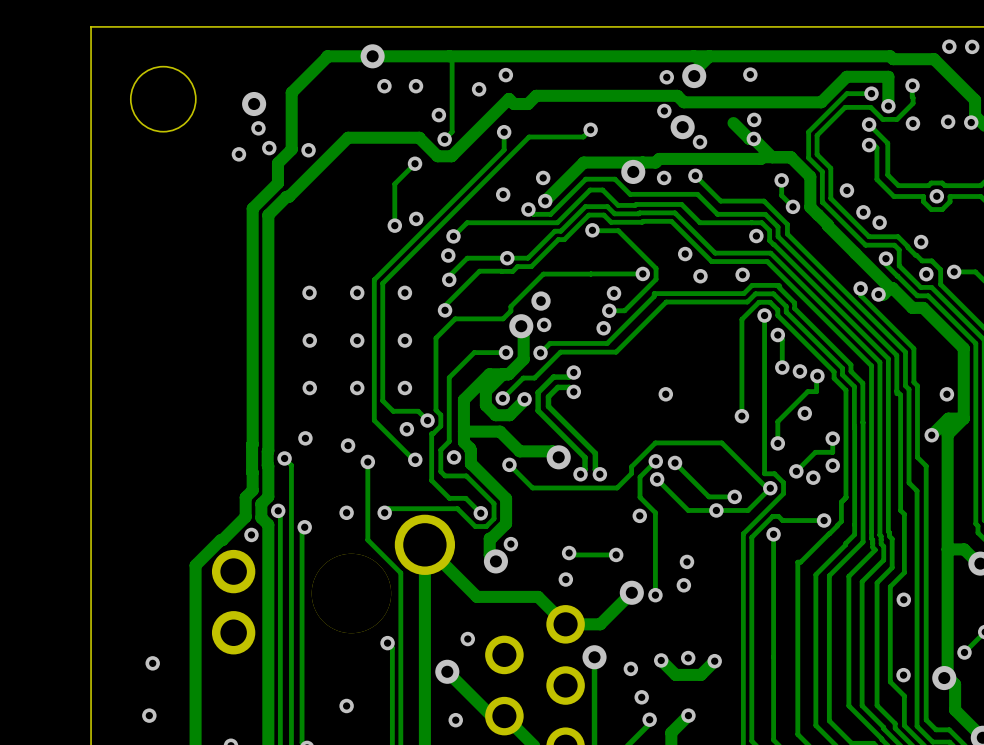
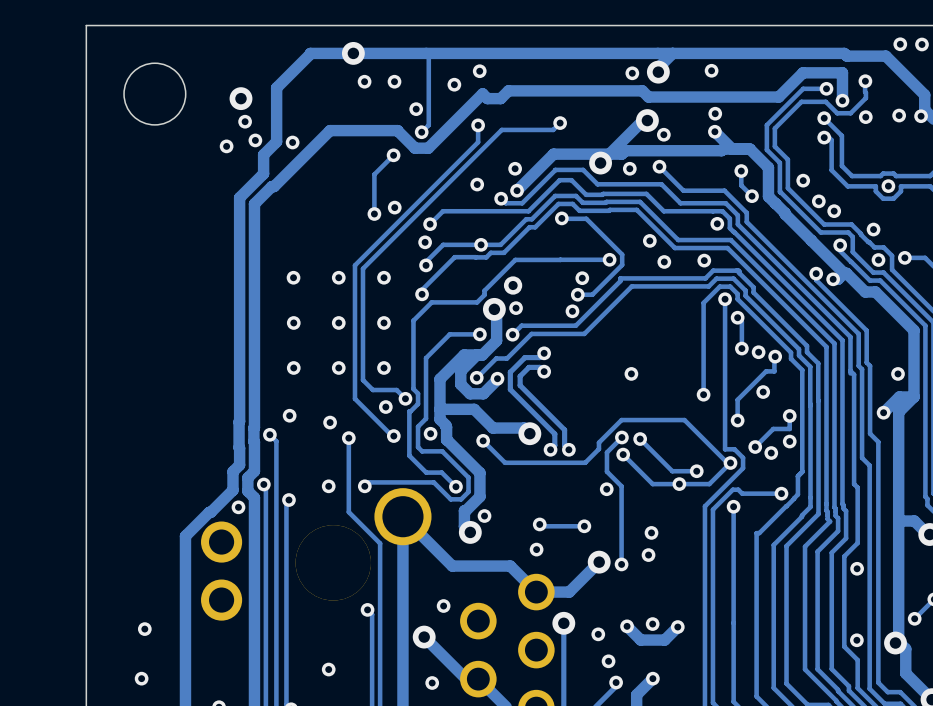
via: (664, 110) -> none
track: (733, 123) (749, 138) (753, 138) -> none
track: none -> (647, 120) (643, 120) (609, 154)

